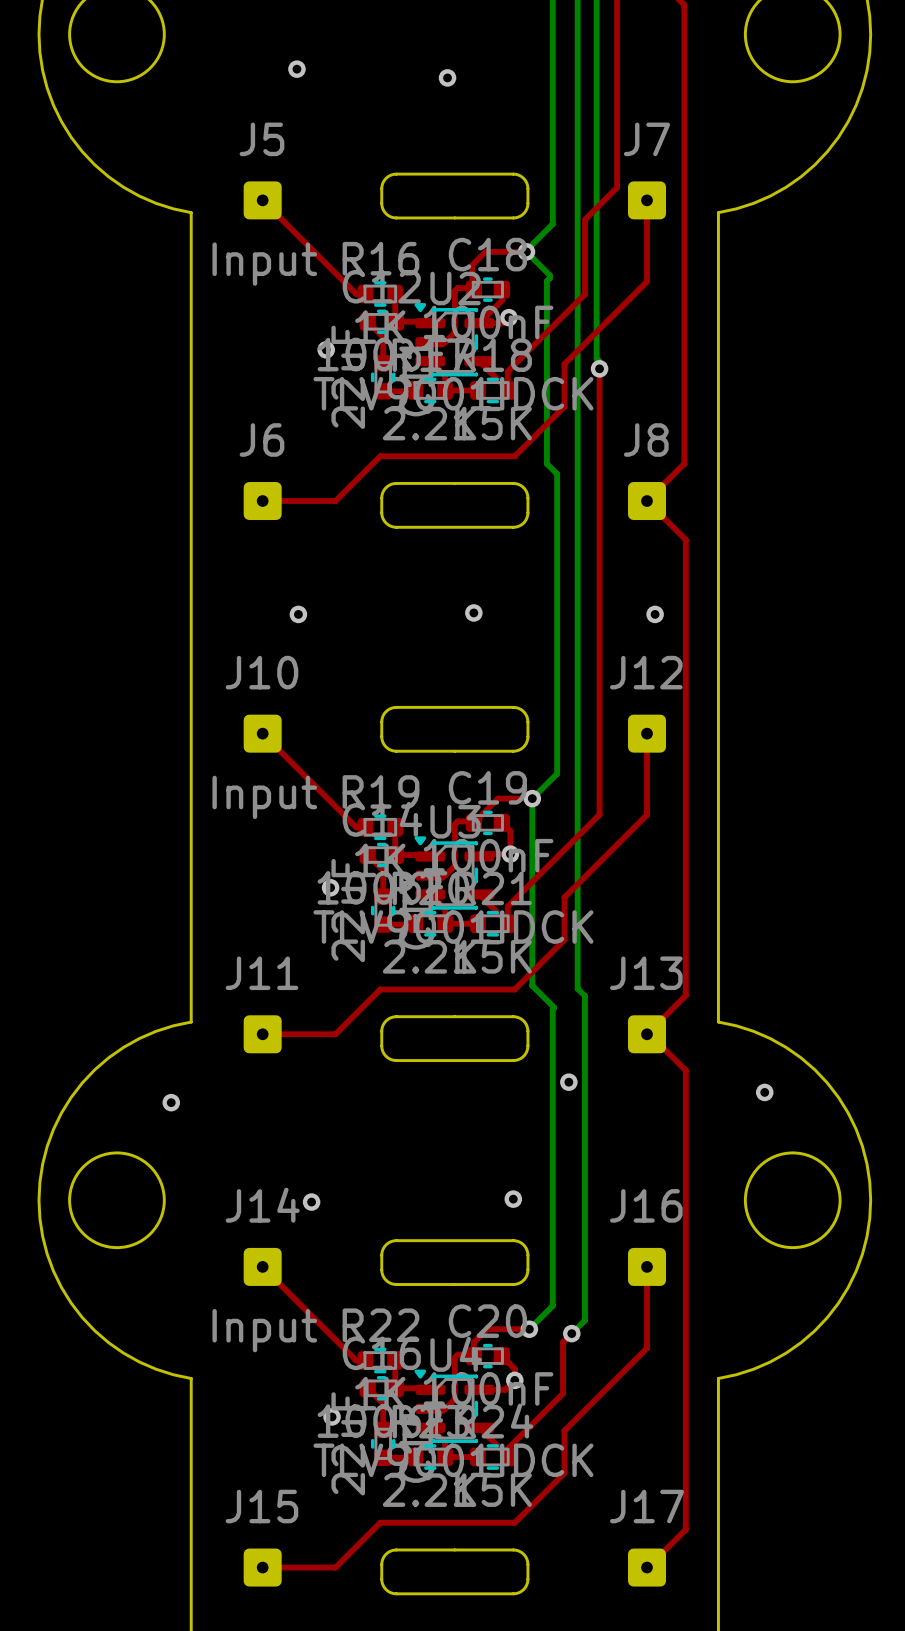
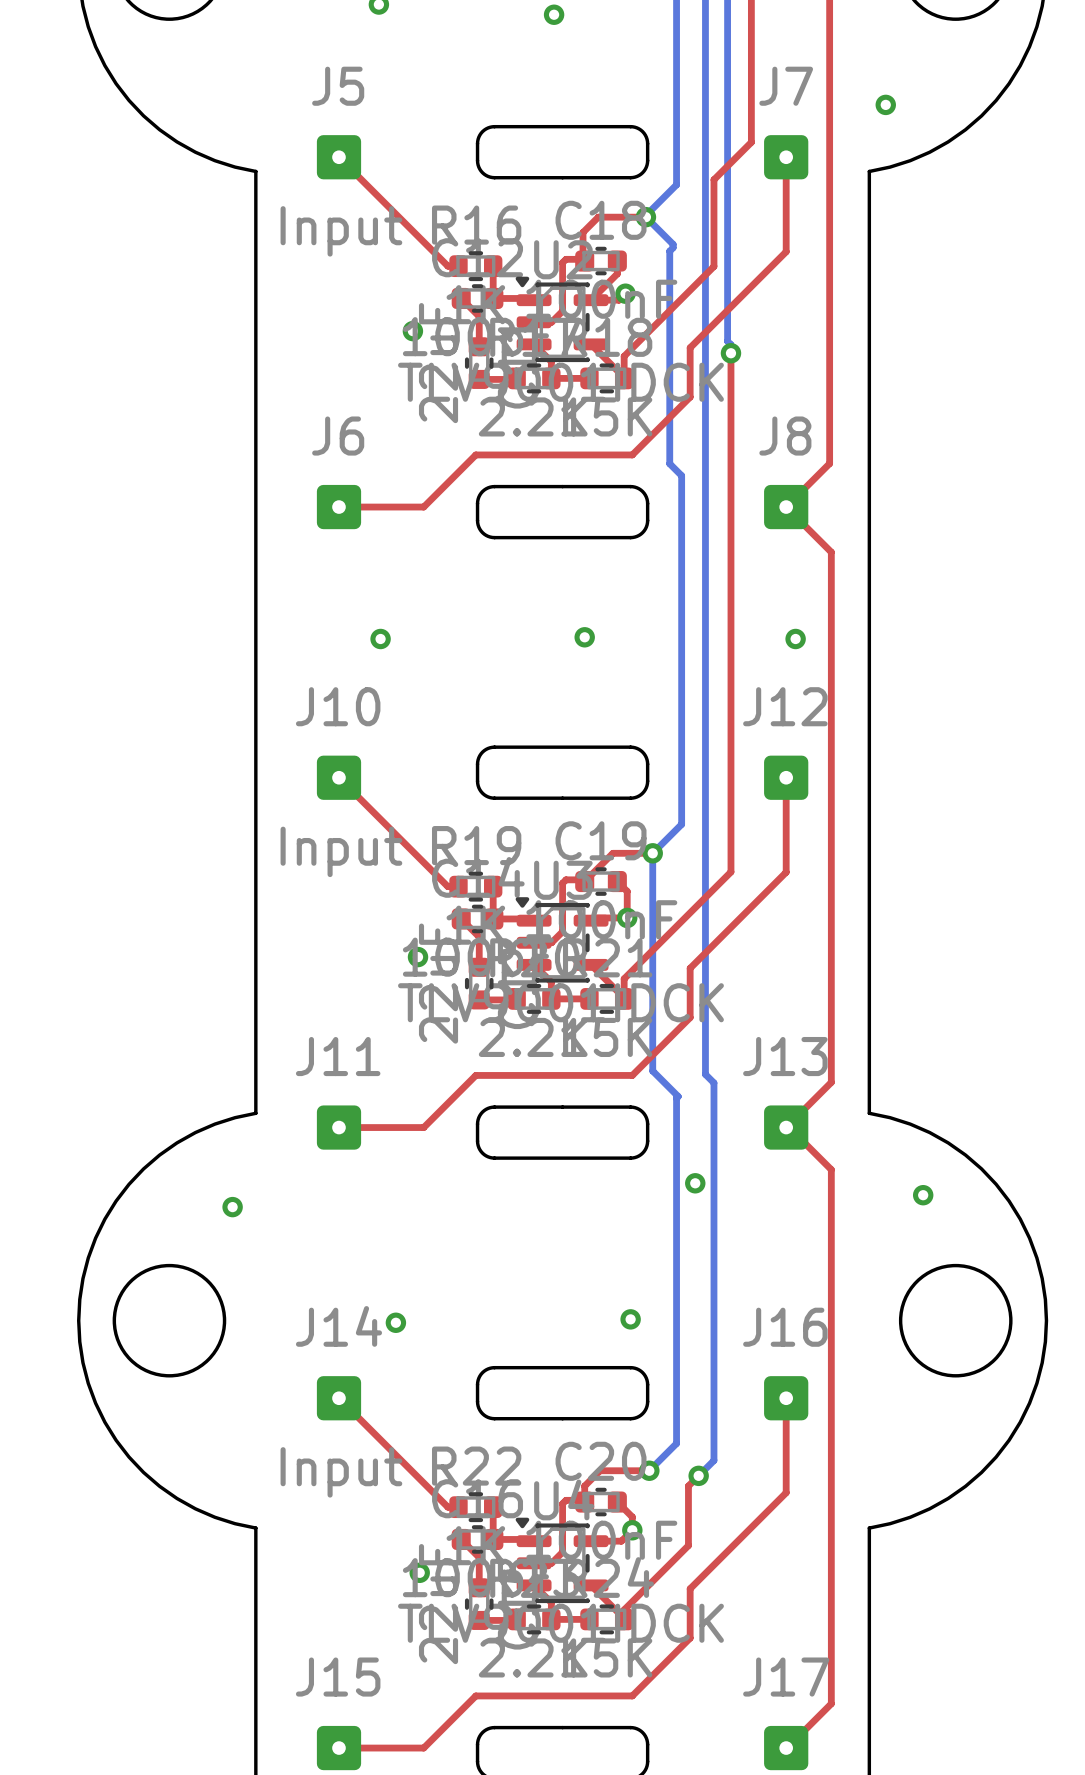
via: none -> (885, 104)

